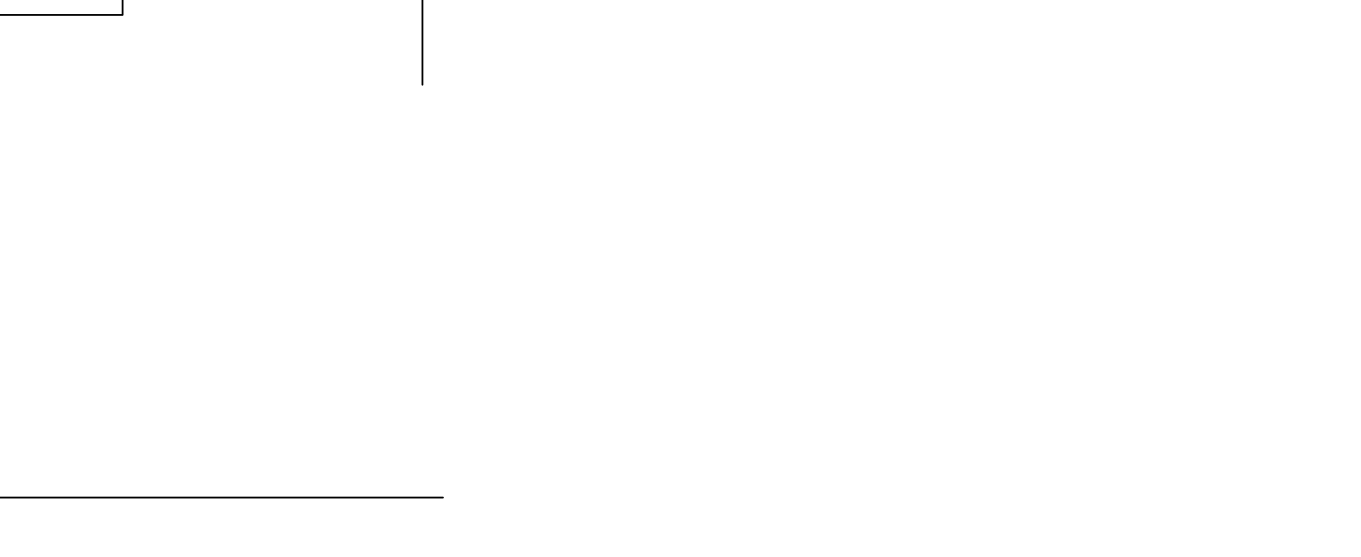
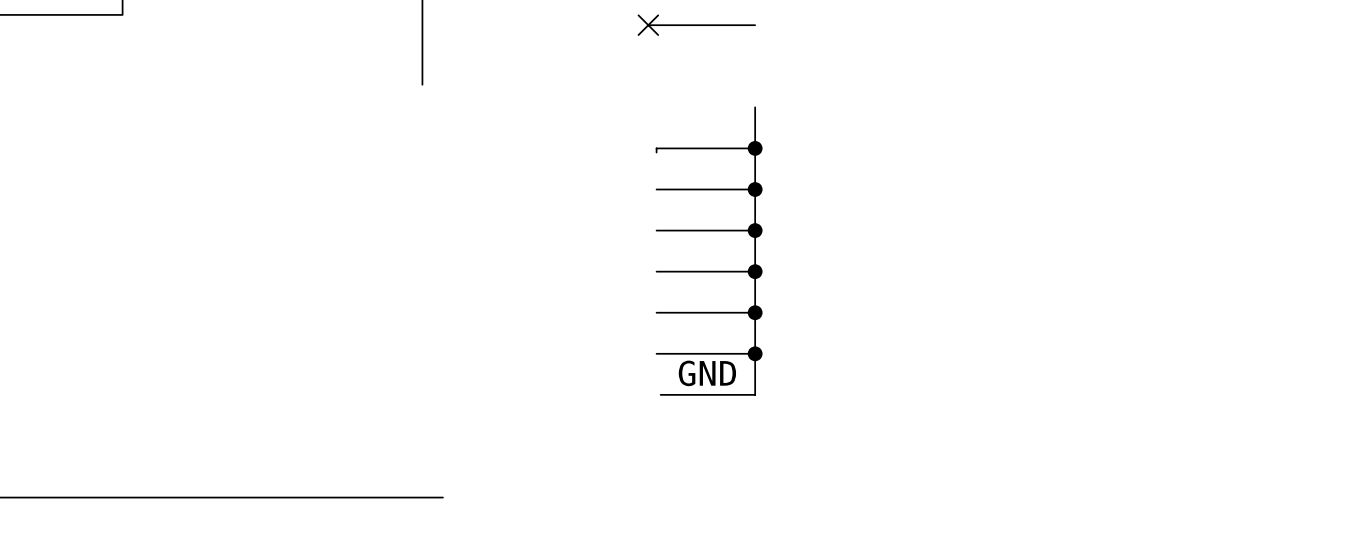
wire: none -> (648, 25) (755, 25)
no-connect mark: none -> (648, 25)
wire: none -> (755, 107) (755, 394) (660, 394)
wire: none -> (755, 148) (656, 148) (656, 152)
junction: none -> (755, 148)
wire: none -> (656, 189) (755, 189)
junction: none -> (755, 189)
wire: none -> (656, 230) (755, 230)
junction: none -> (755, 230)
wire: none -> (656, 271) (755, 271)
junction: none -> (755, 271)
wire: none -> (656, 312) (755, 312)
junction: none -> (755, 312)
wire: none -> (656, 353) (755, 353)
junction: none -> (755, 353)
label: none -> GND (707, 373)

